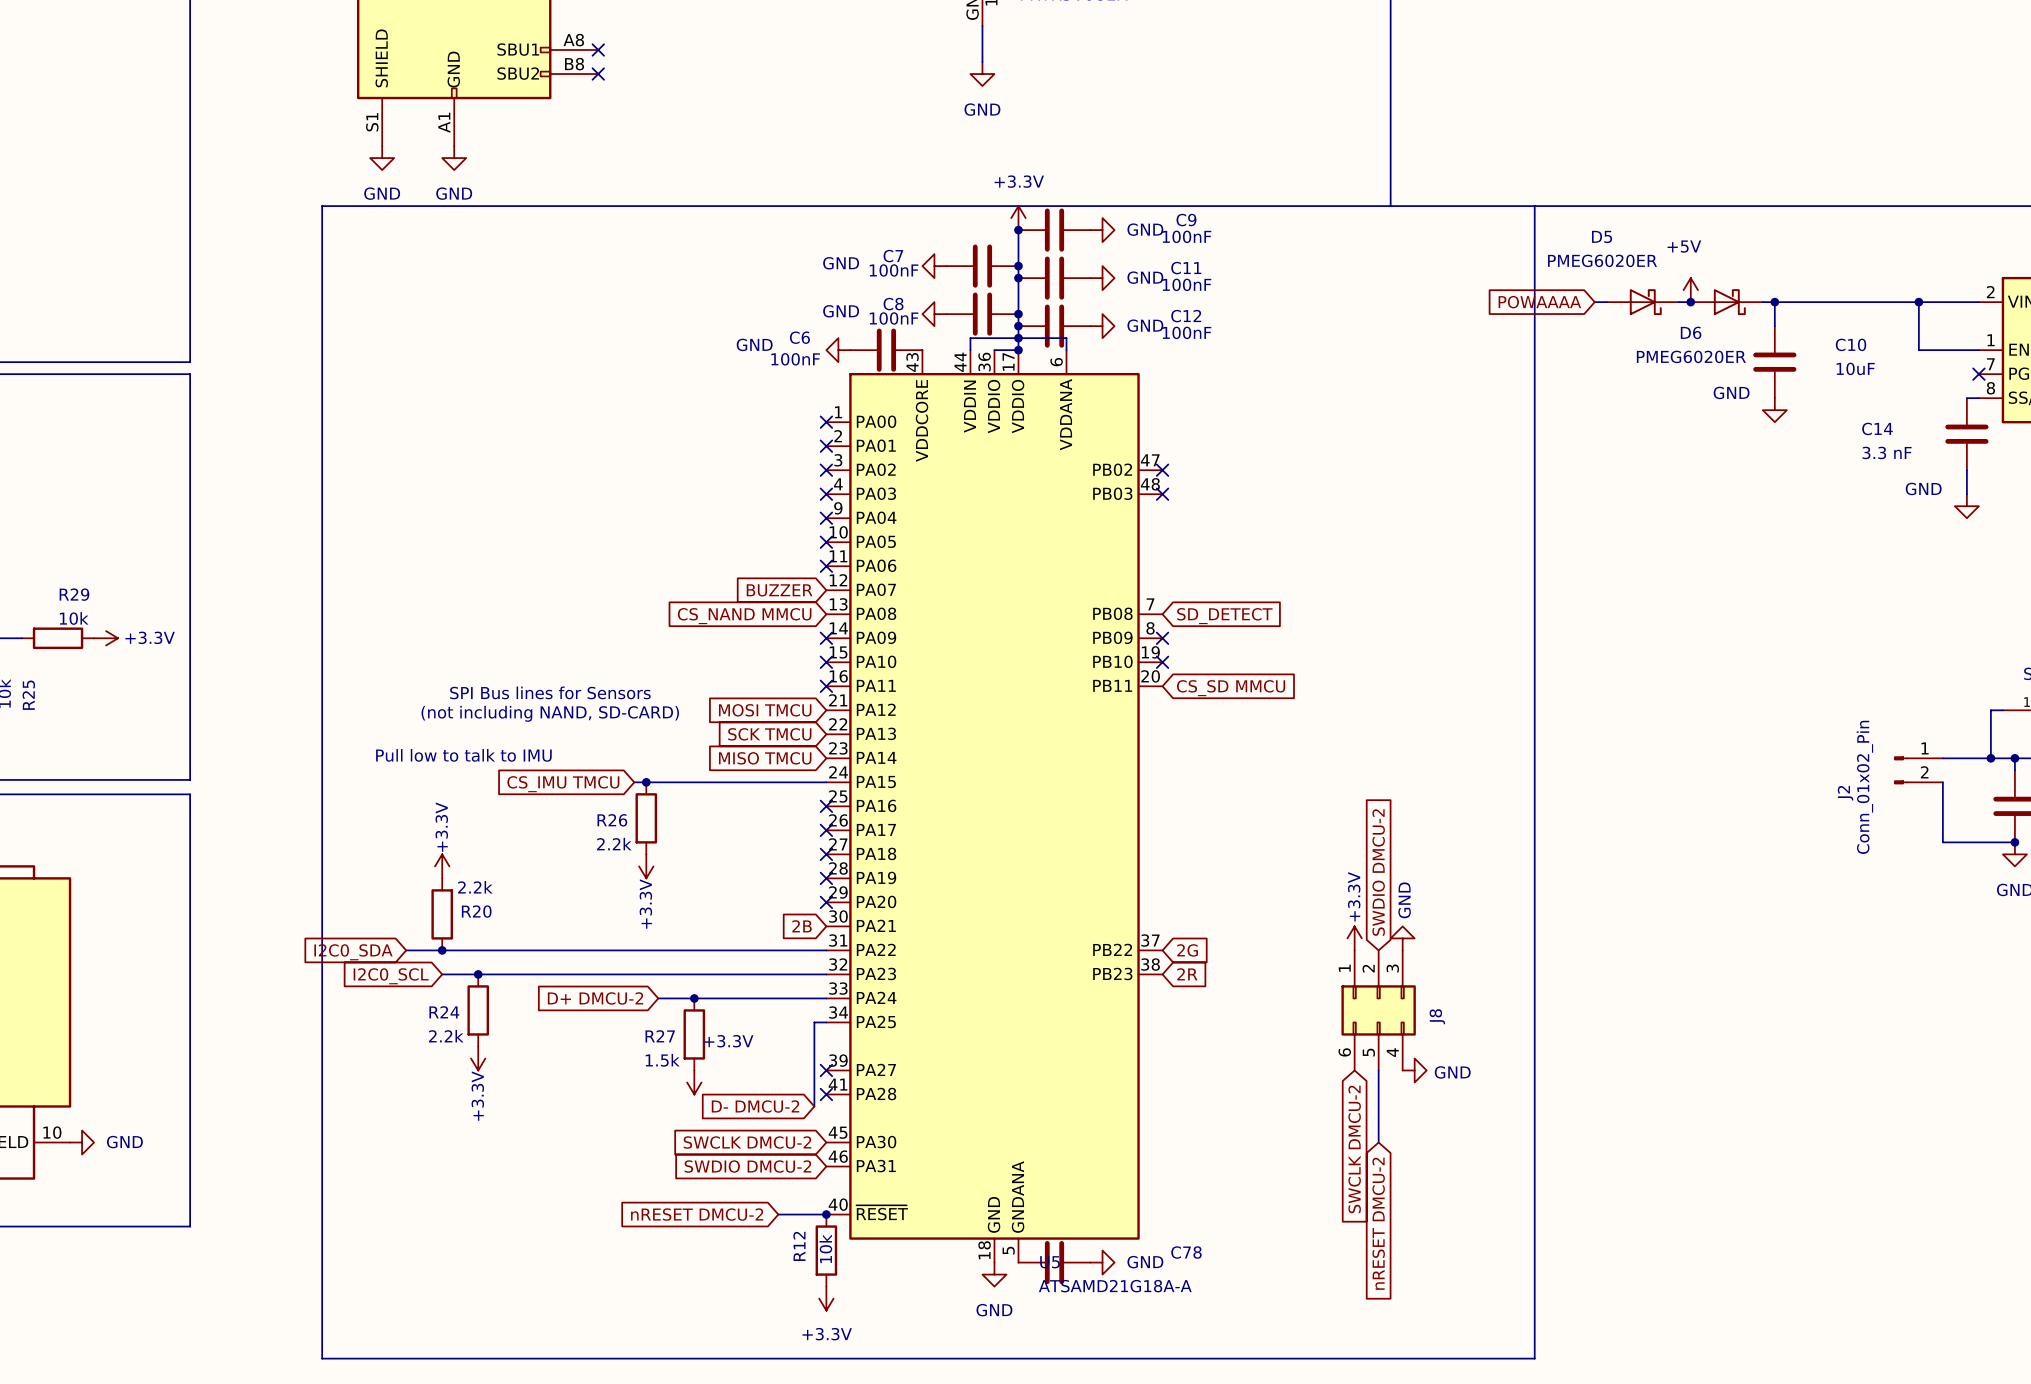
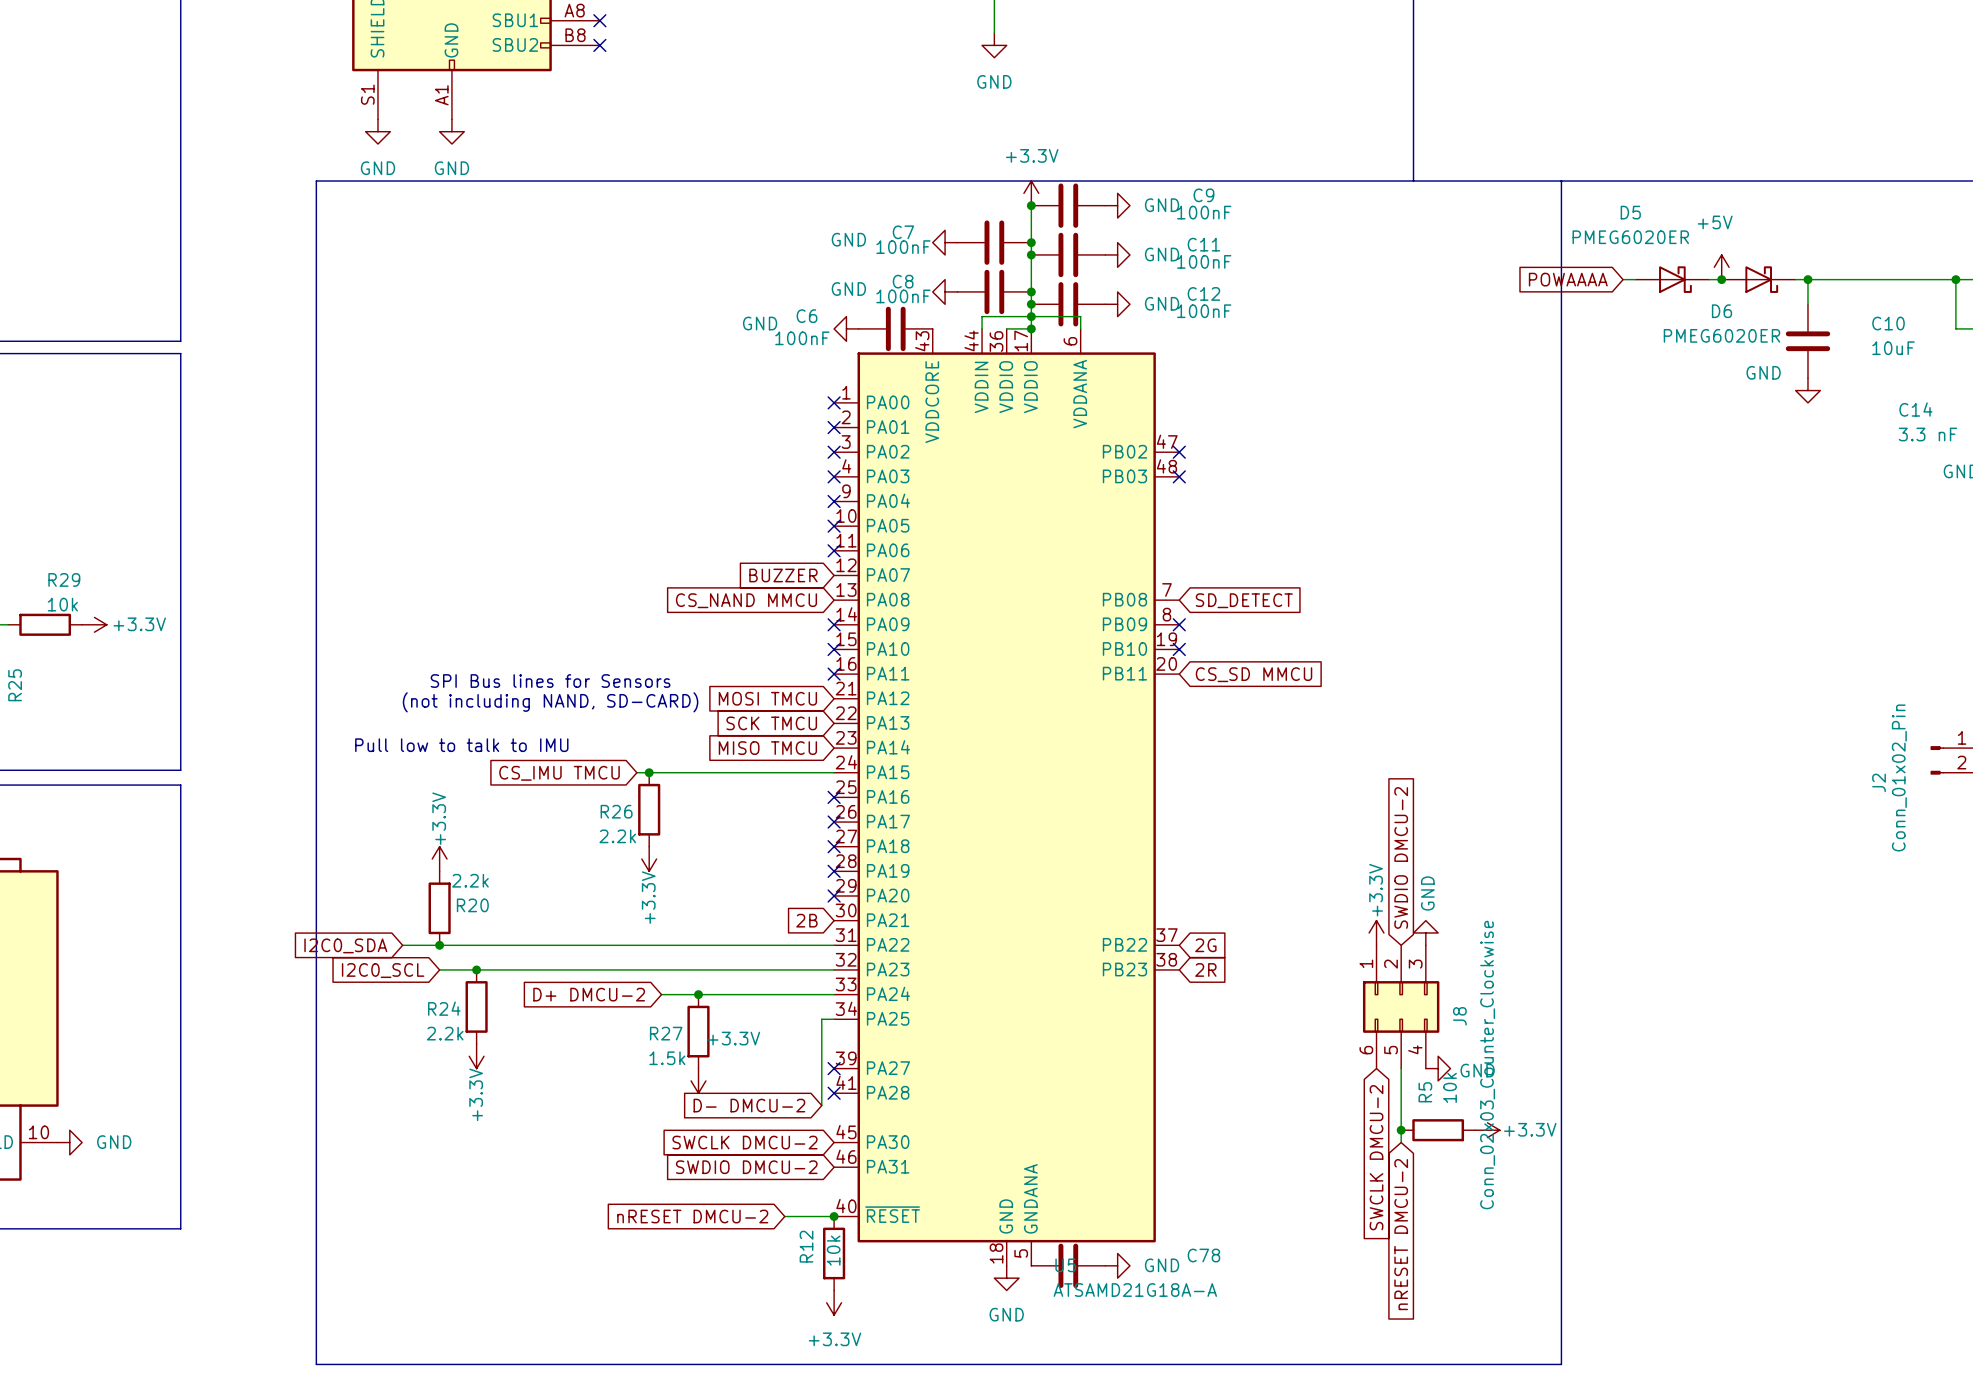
J8 value: none -> Conn_02x03_Counter_Clockwise (1487, 1065)
junction: none -> (1401, 1130)
R5: none -> 10k (1438, 1130)
power symbol: none -> +3.3V (1487, 1130)

